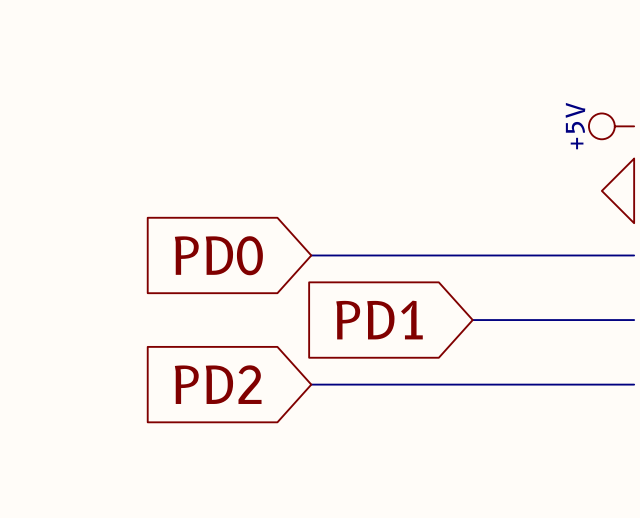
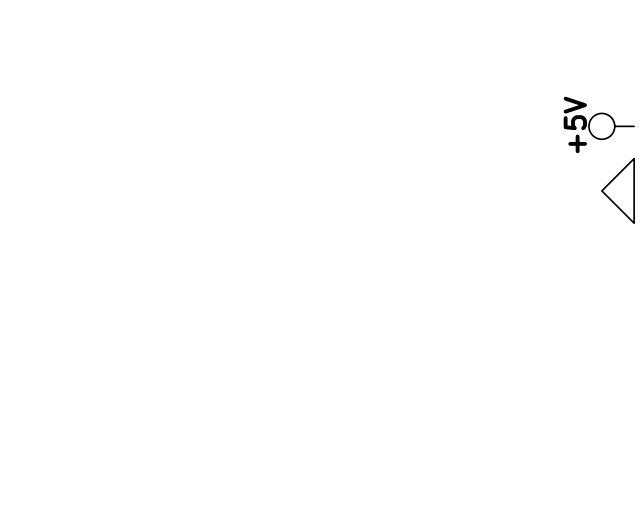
global label: PD0 (218, 255) -> none
wire: (311, 255) (634, 255) -> none
global label: PD1 (379, 320) -> none
wire: (472, 320) (634, 320) -> none
global label: PD2 (218, 384) -> none
wire: (311, 384) (634, 384) -> none

